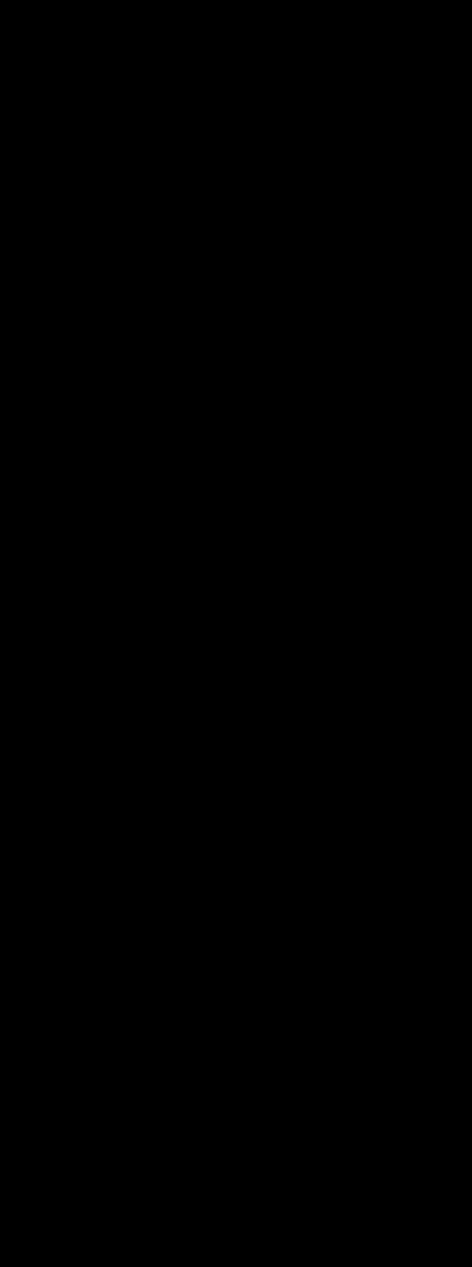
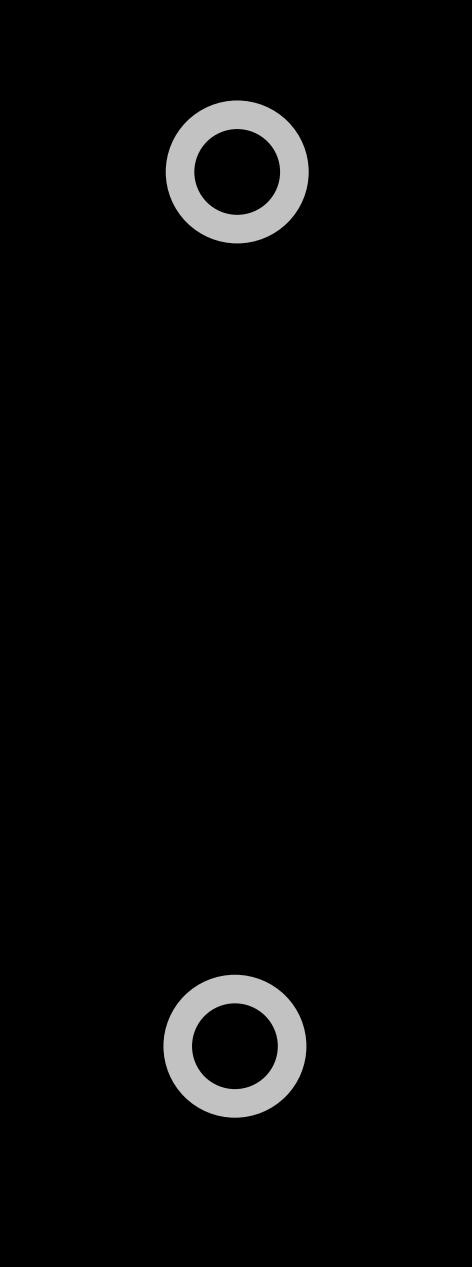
via: none -> (237, 171)
via: none -> (234, 1046)

